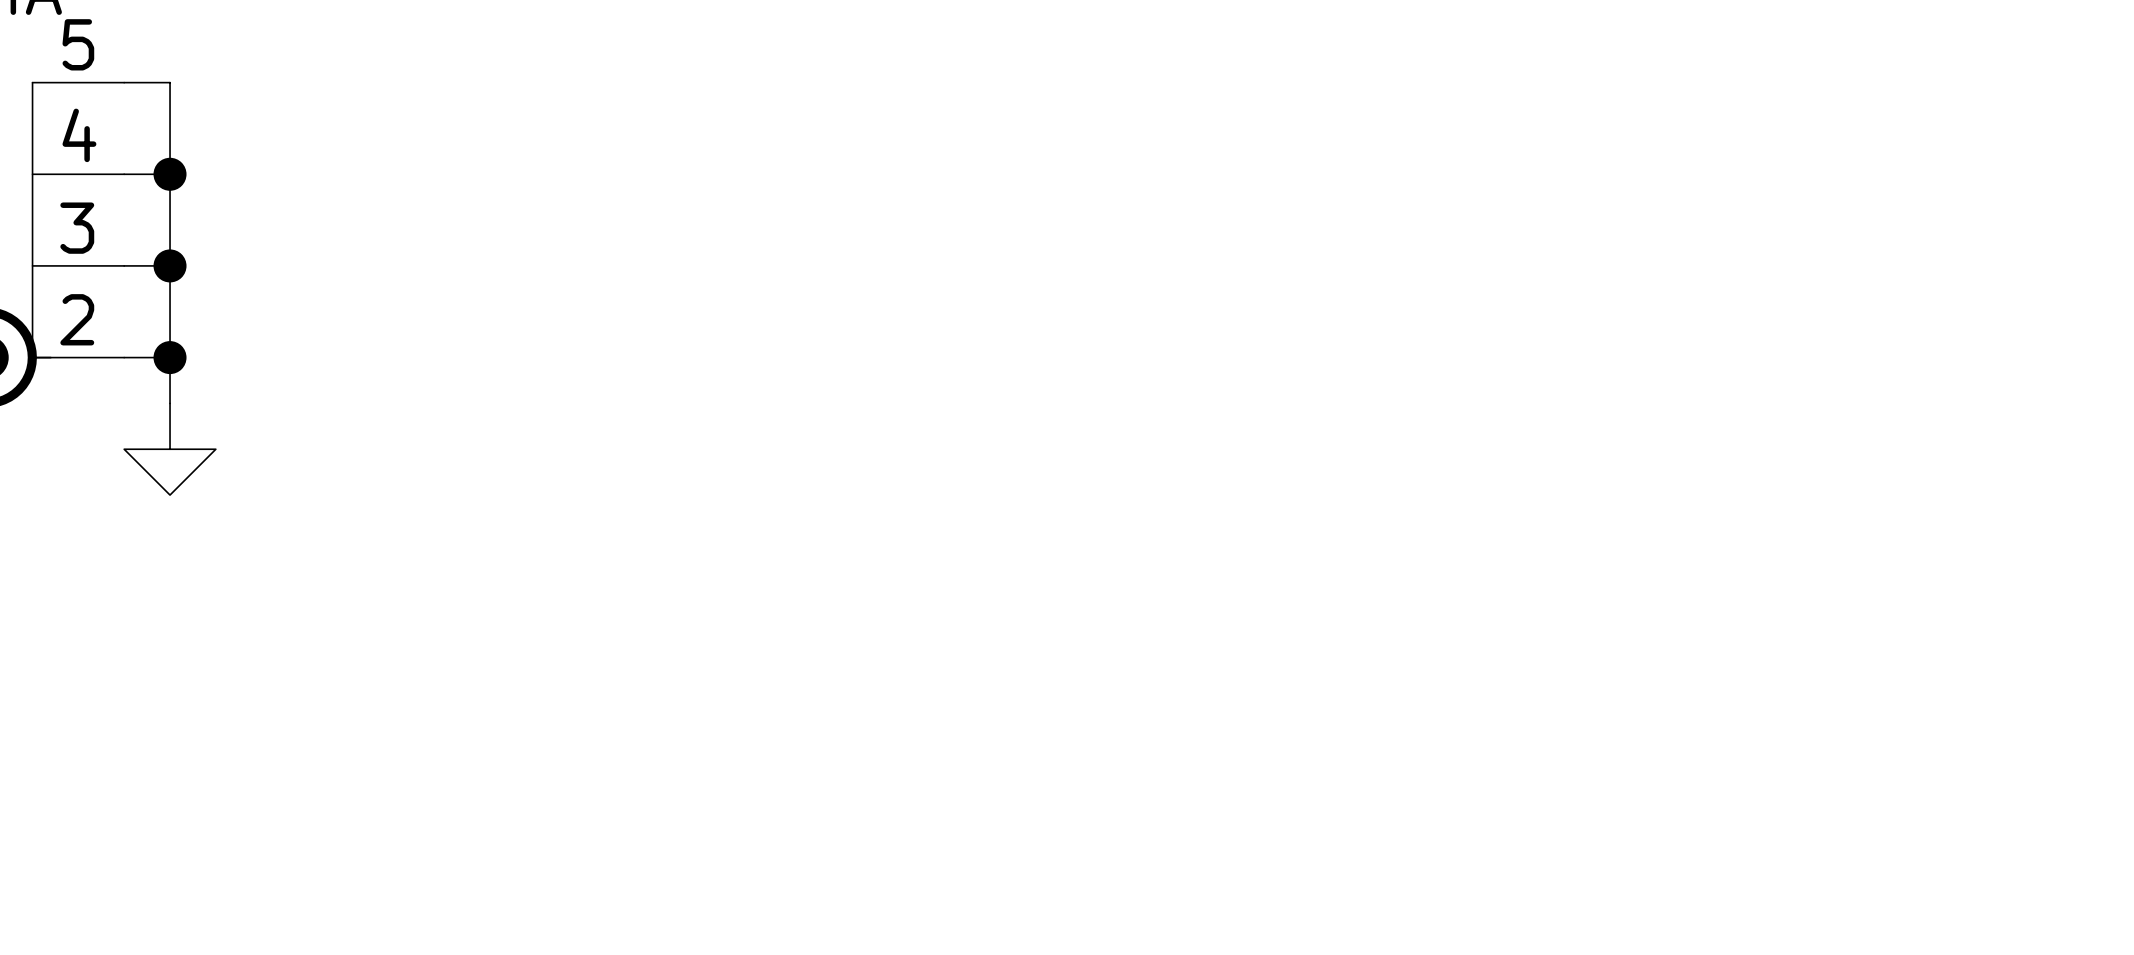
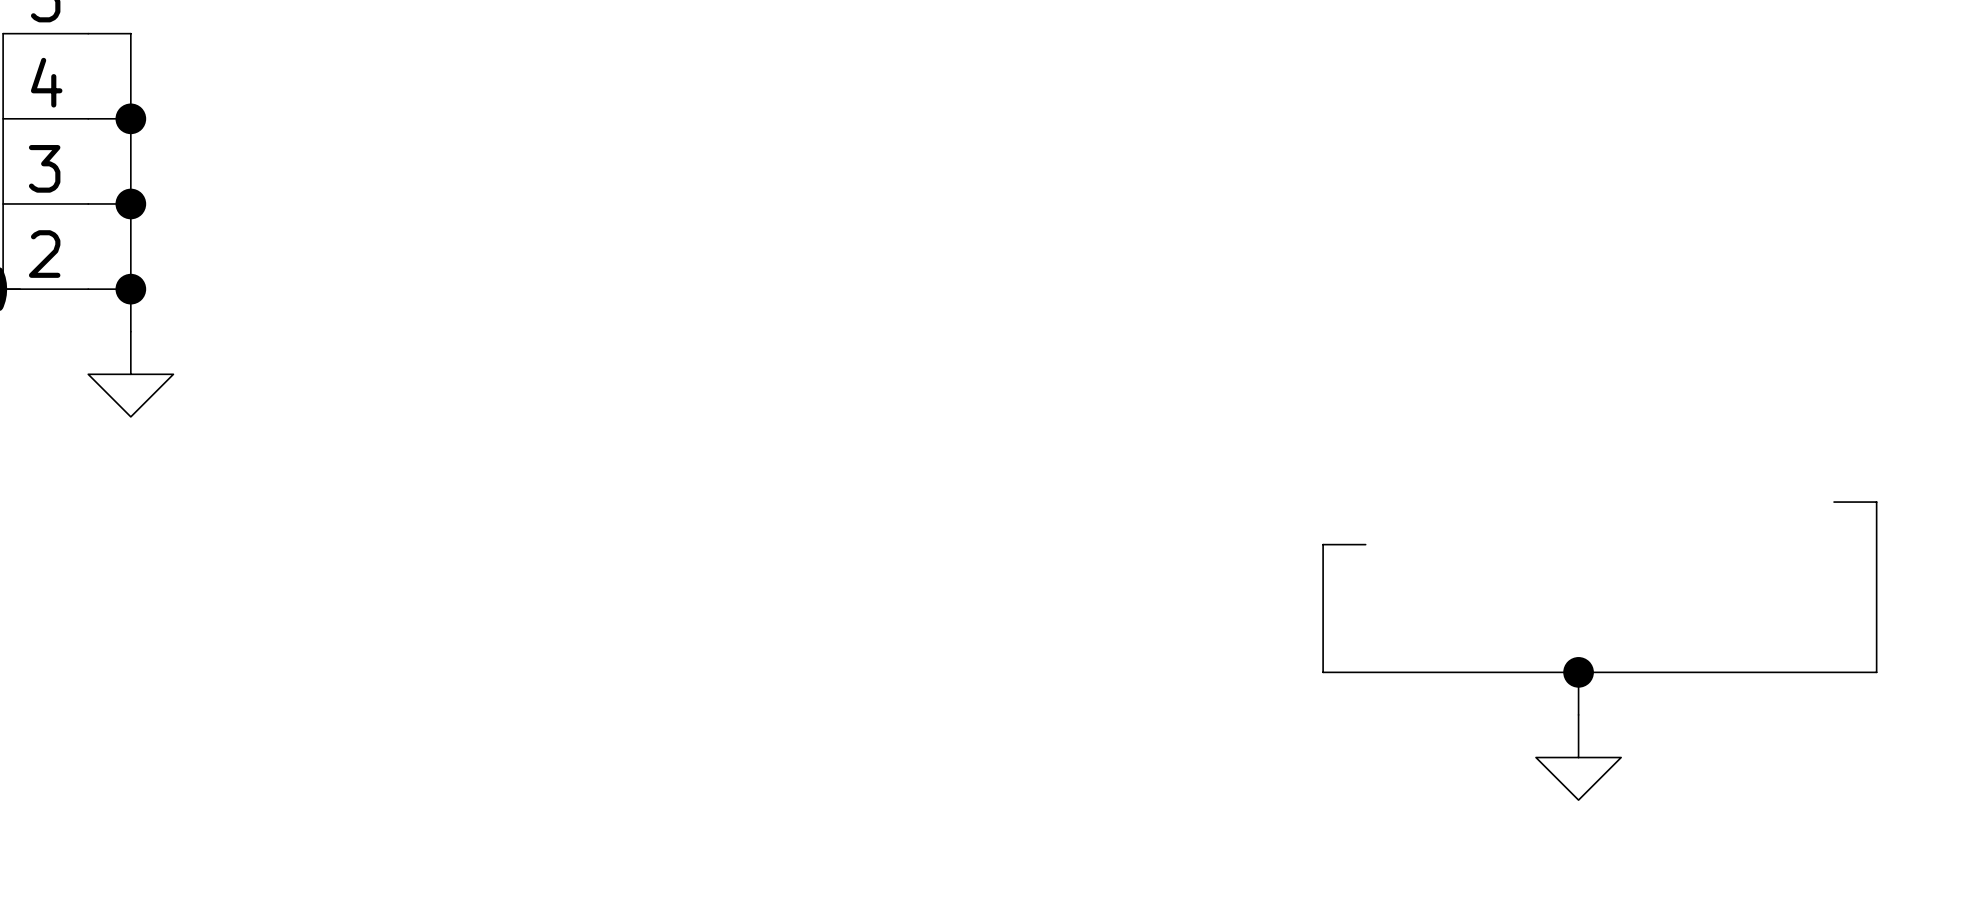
wire: none -> (1834, 502) (1876, 502) (1876, 672) (1323, 672) (1323, 544) (1365, 544)
wire: none -> (1578, 672) (1578, 714)
junction: none -> (1578, 672)
power symbol: none -> (1578, 757)

